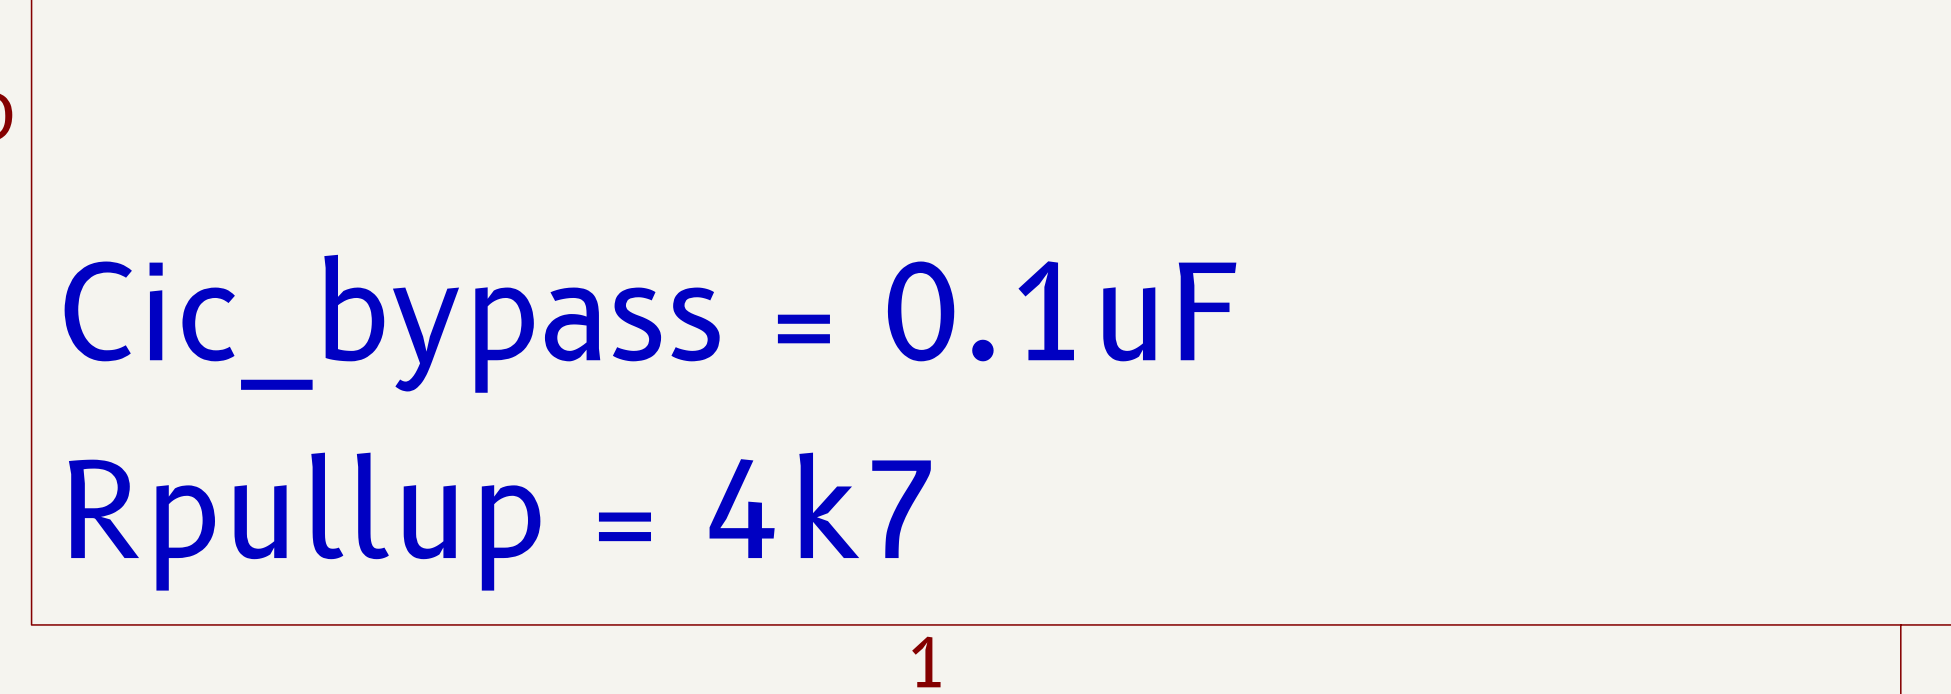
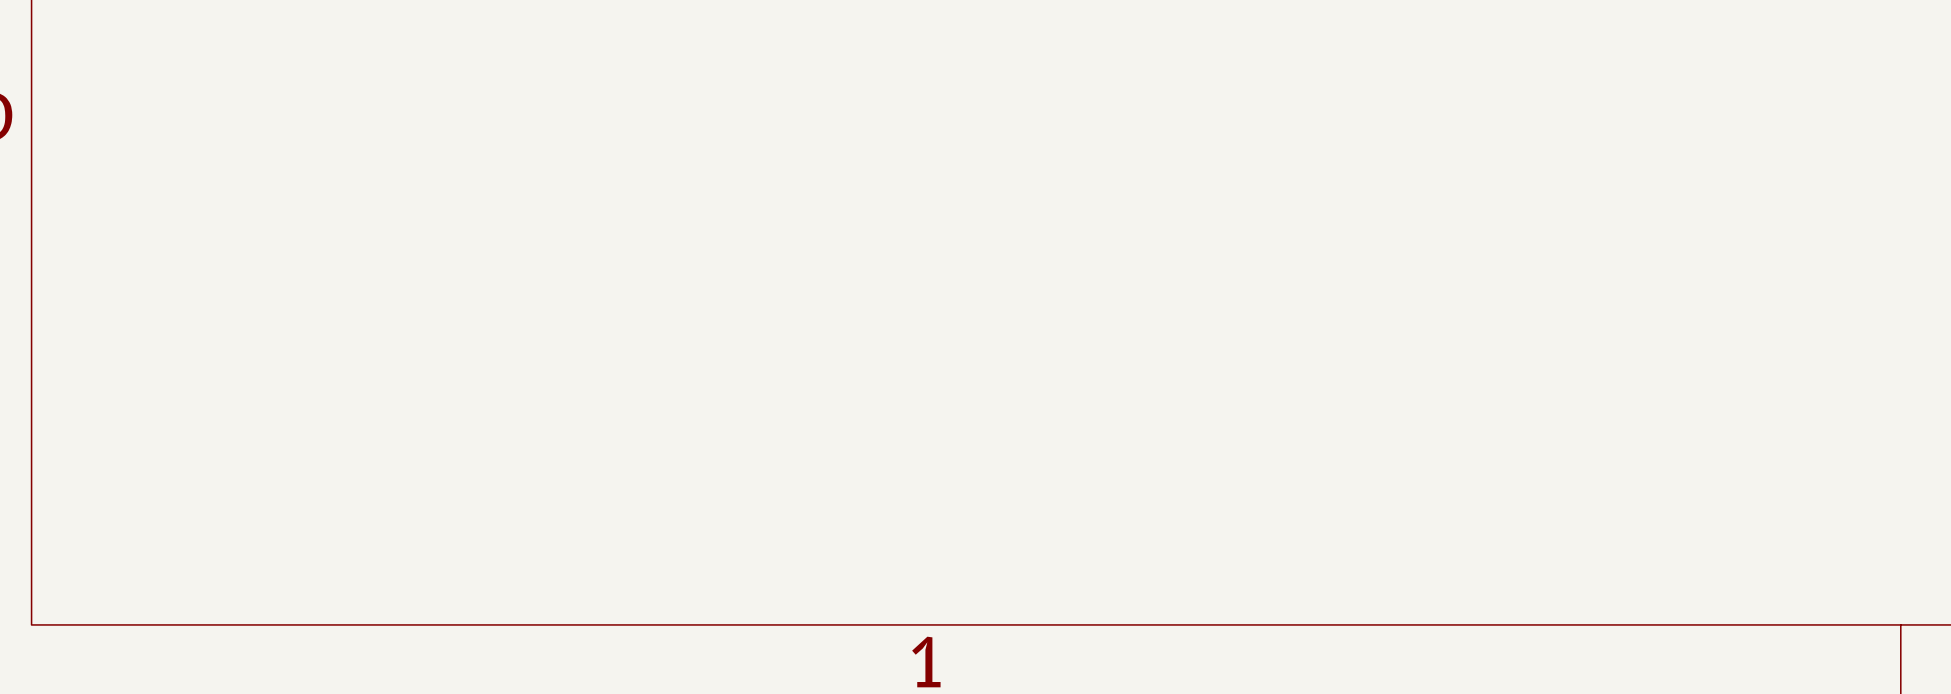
text: Cic_bypass = 0.1uF (650, 323) -> none
text: Rpullup = 4k7 (499, 521) -> none

